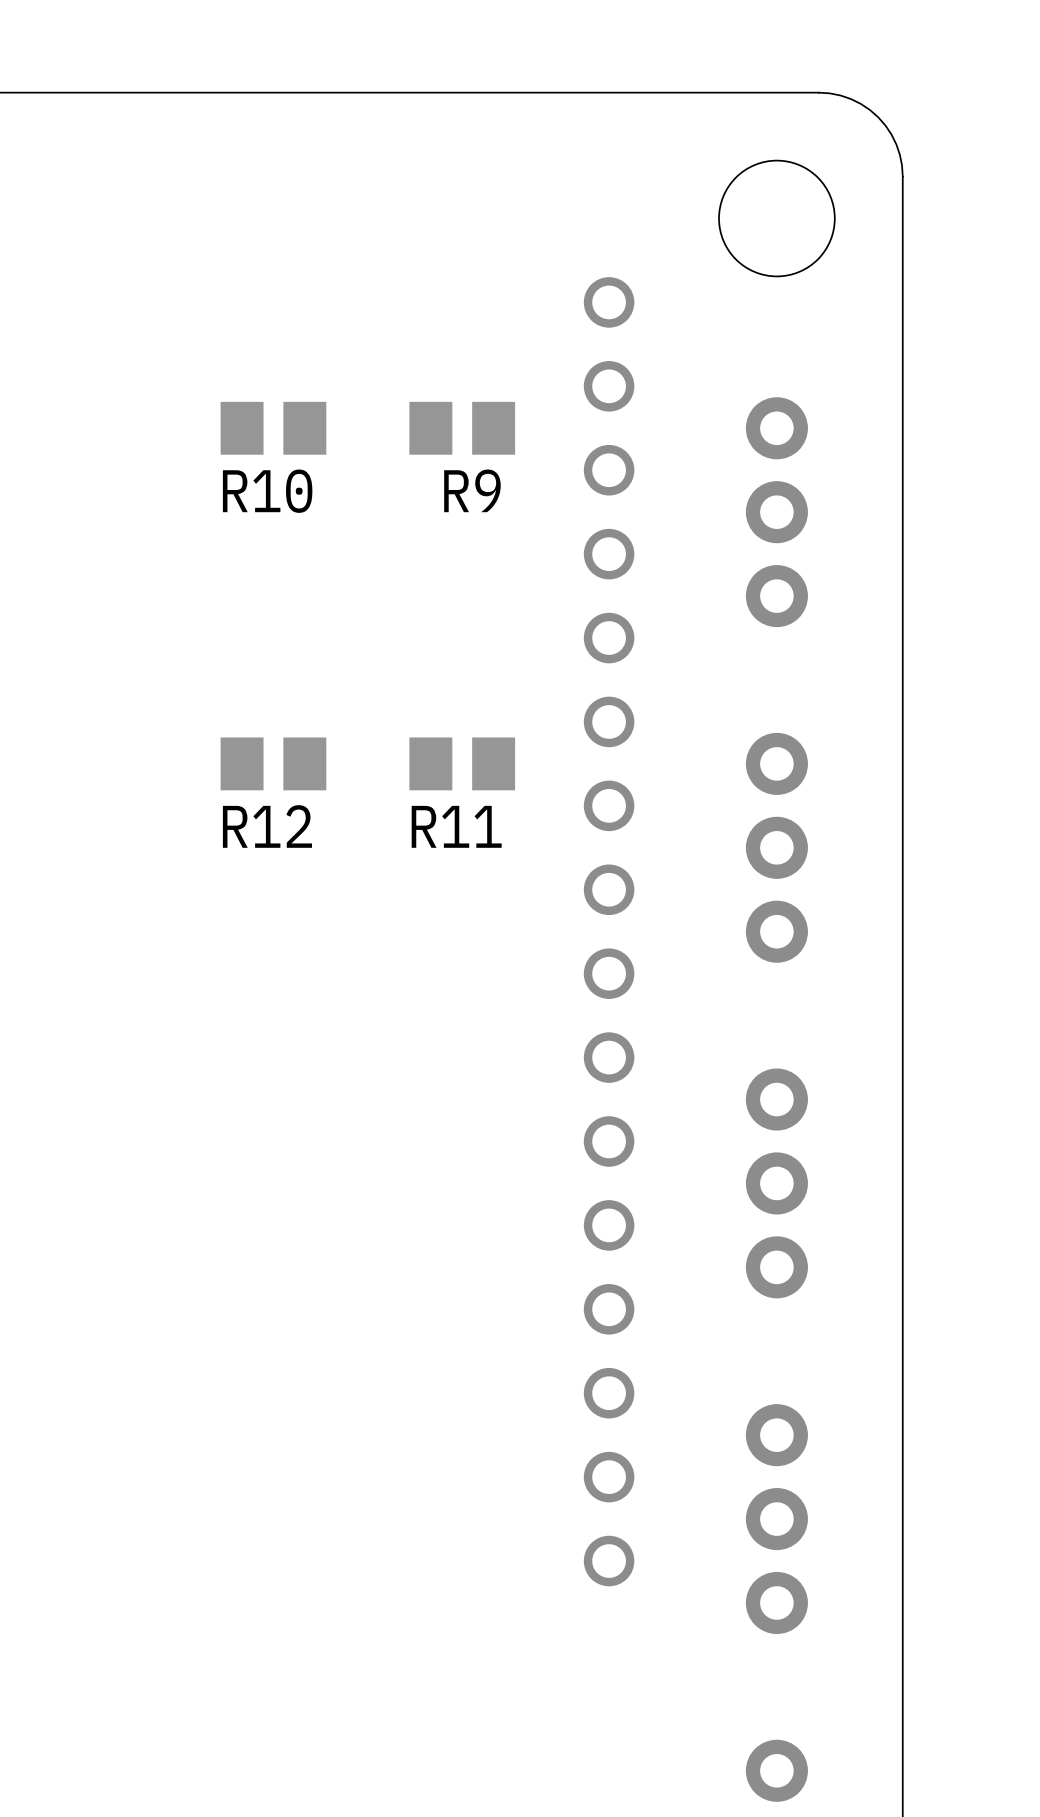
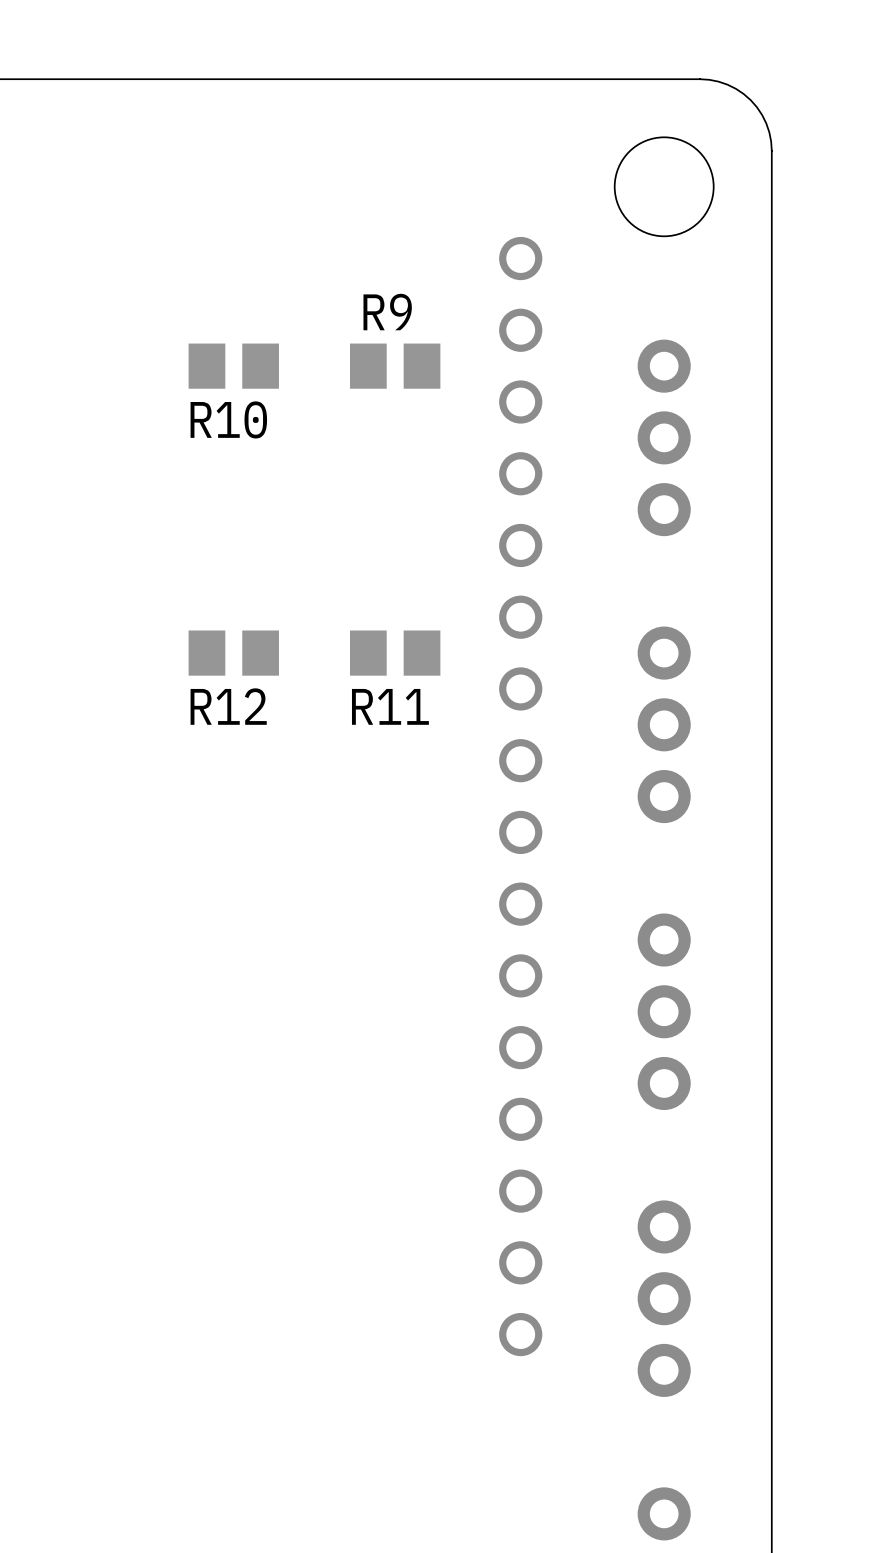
R9 name position: R9 (472, 490) -> R9 (387, 312)

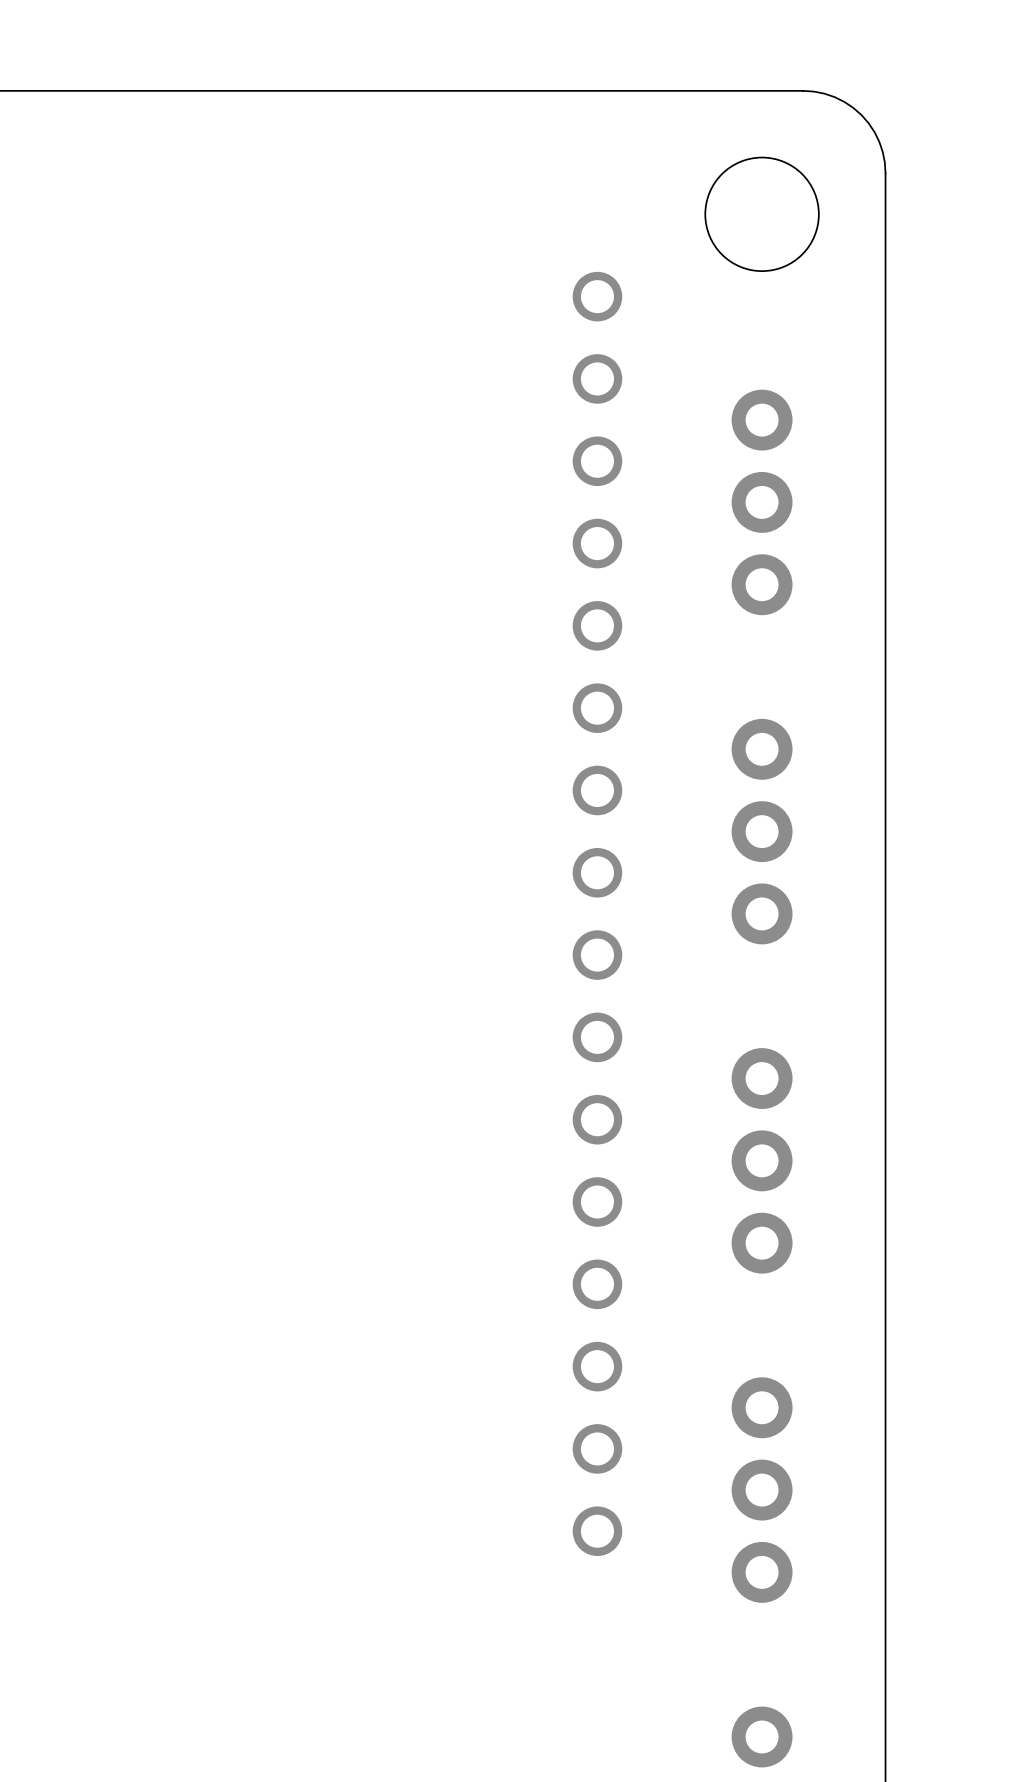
R10: (233, 366) -> none
R9: (395, 366) -> none
R12: (233, 653) -> none
R11: (395, 653) -> none

